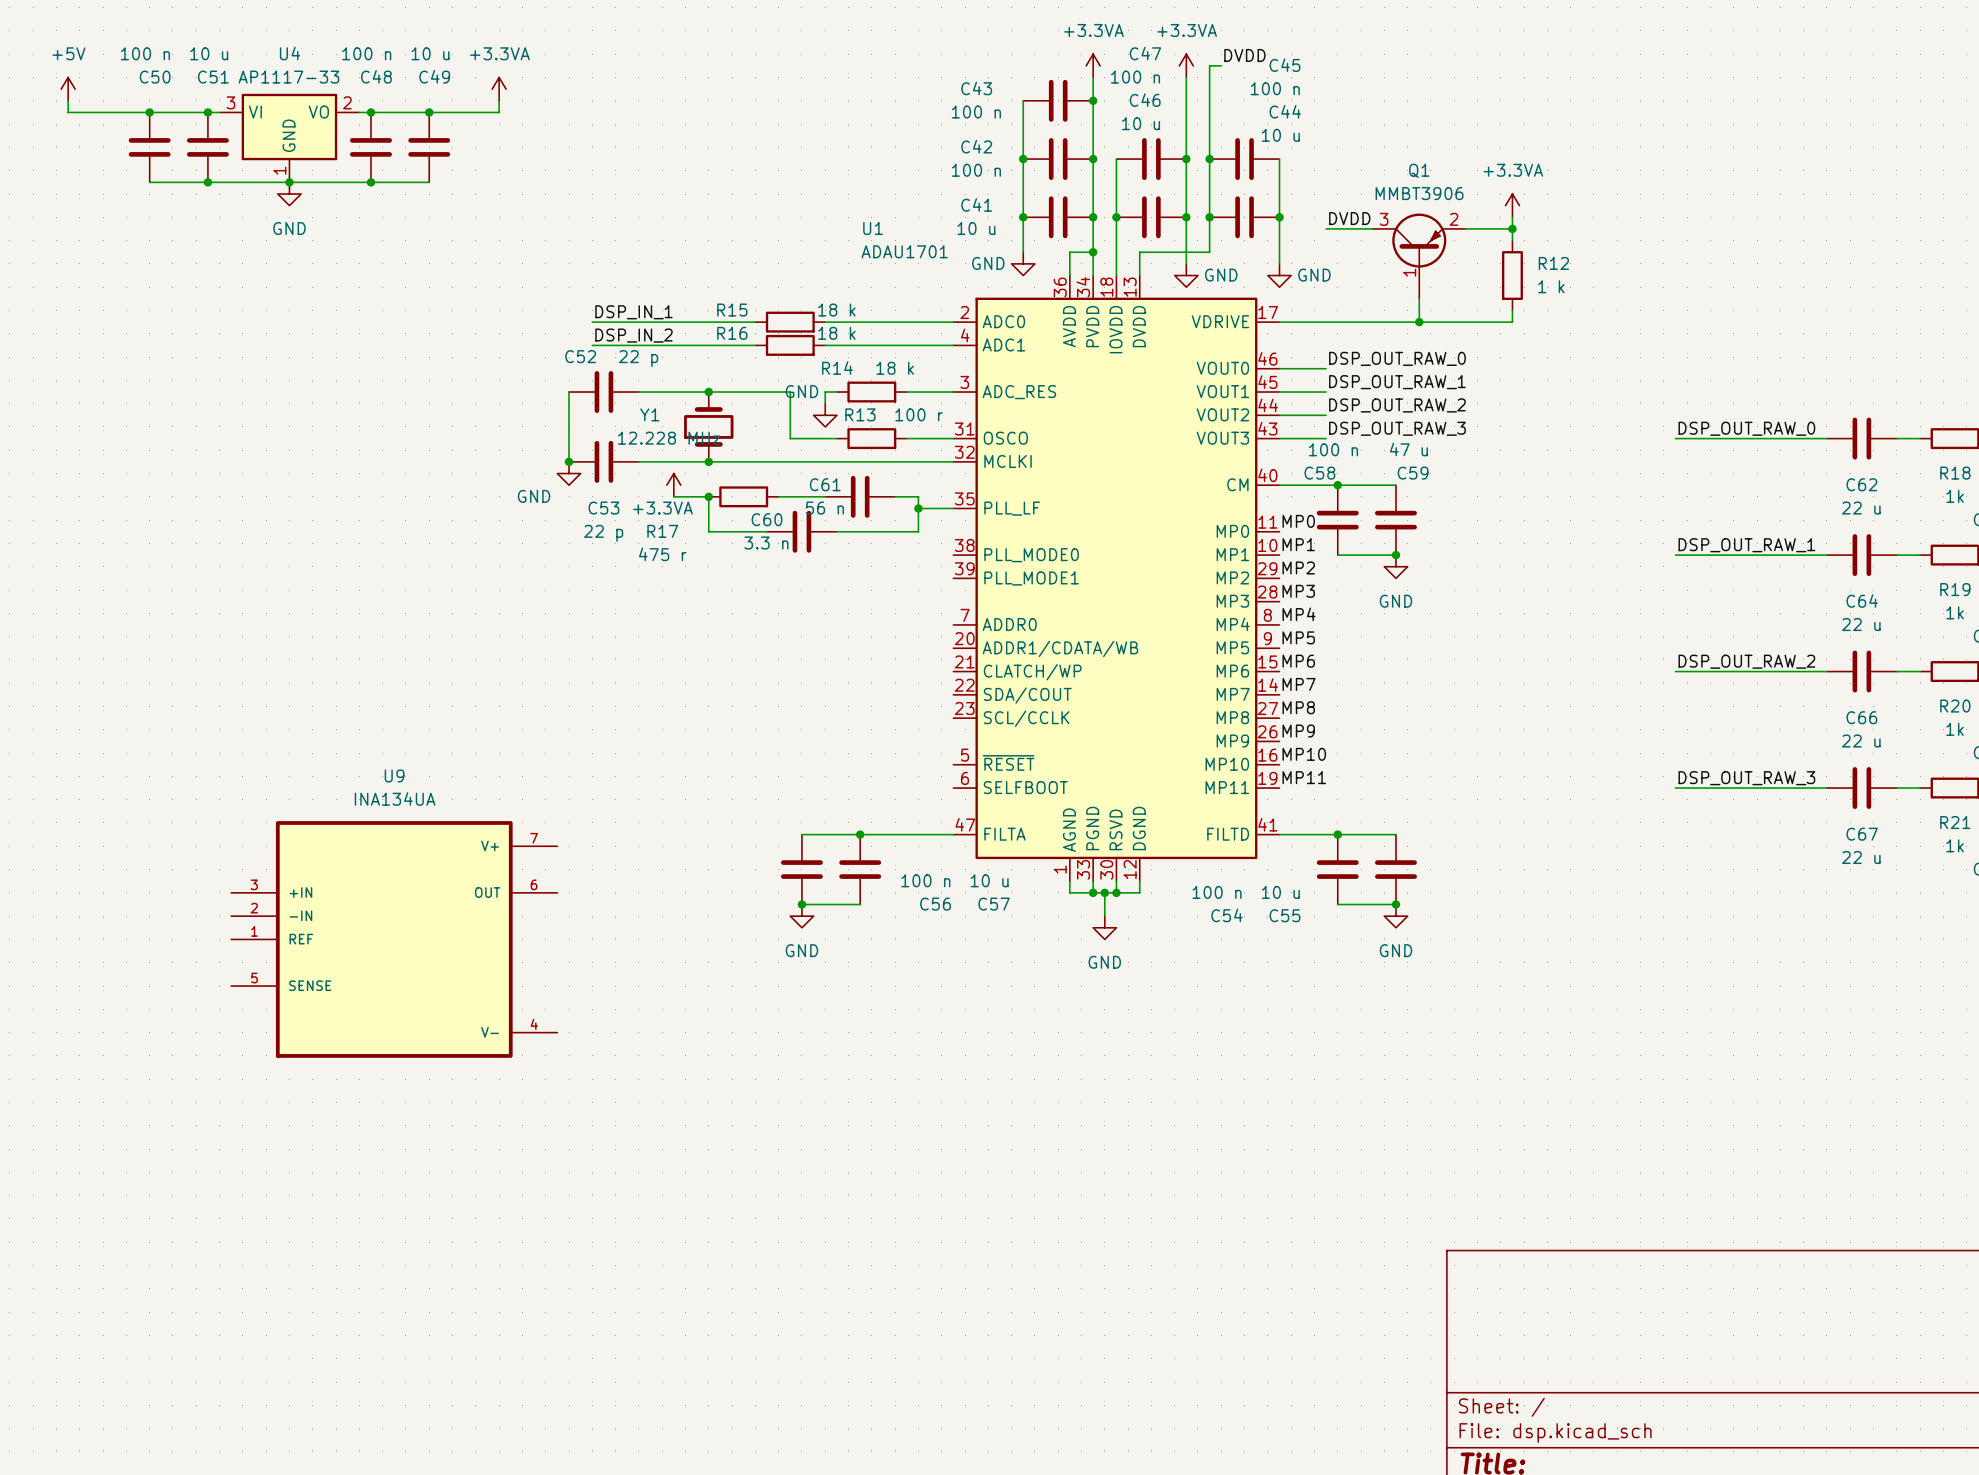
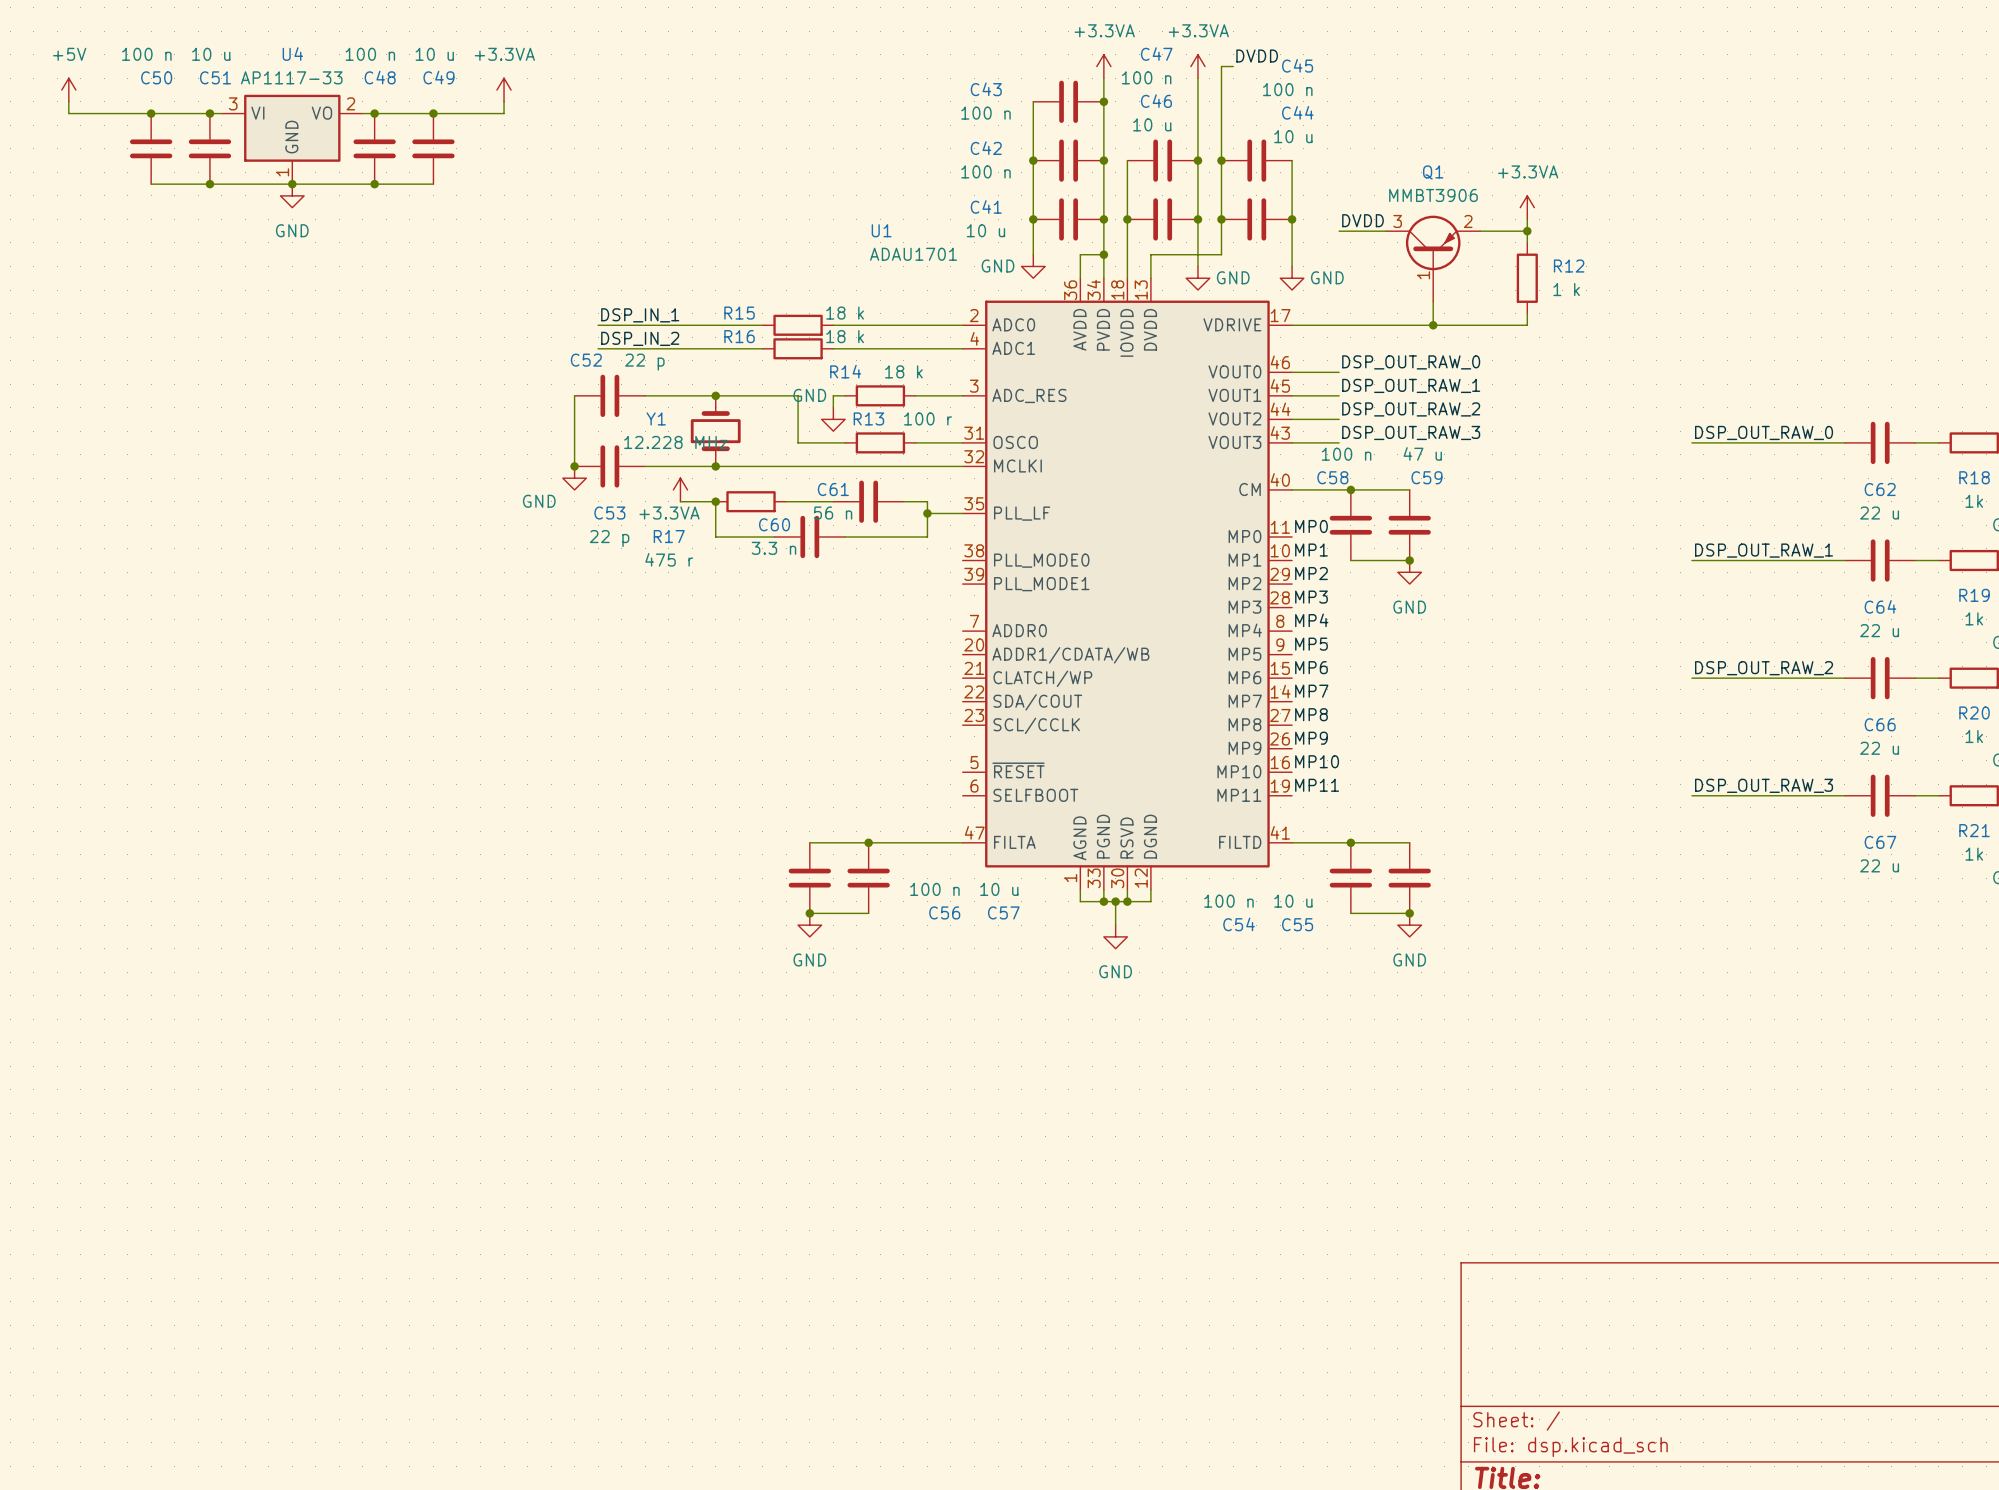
U9: INA134UA (394, 939) -> none

